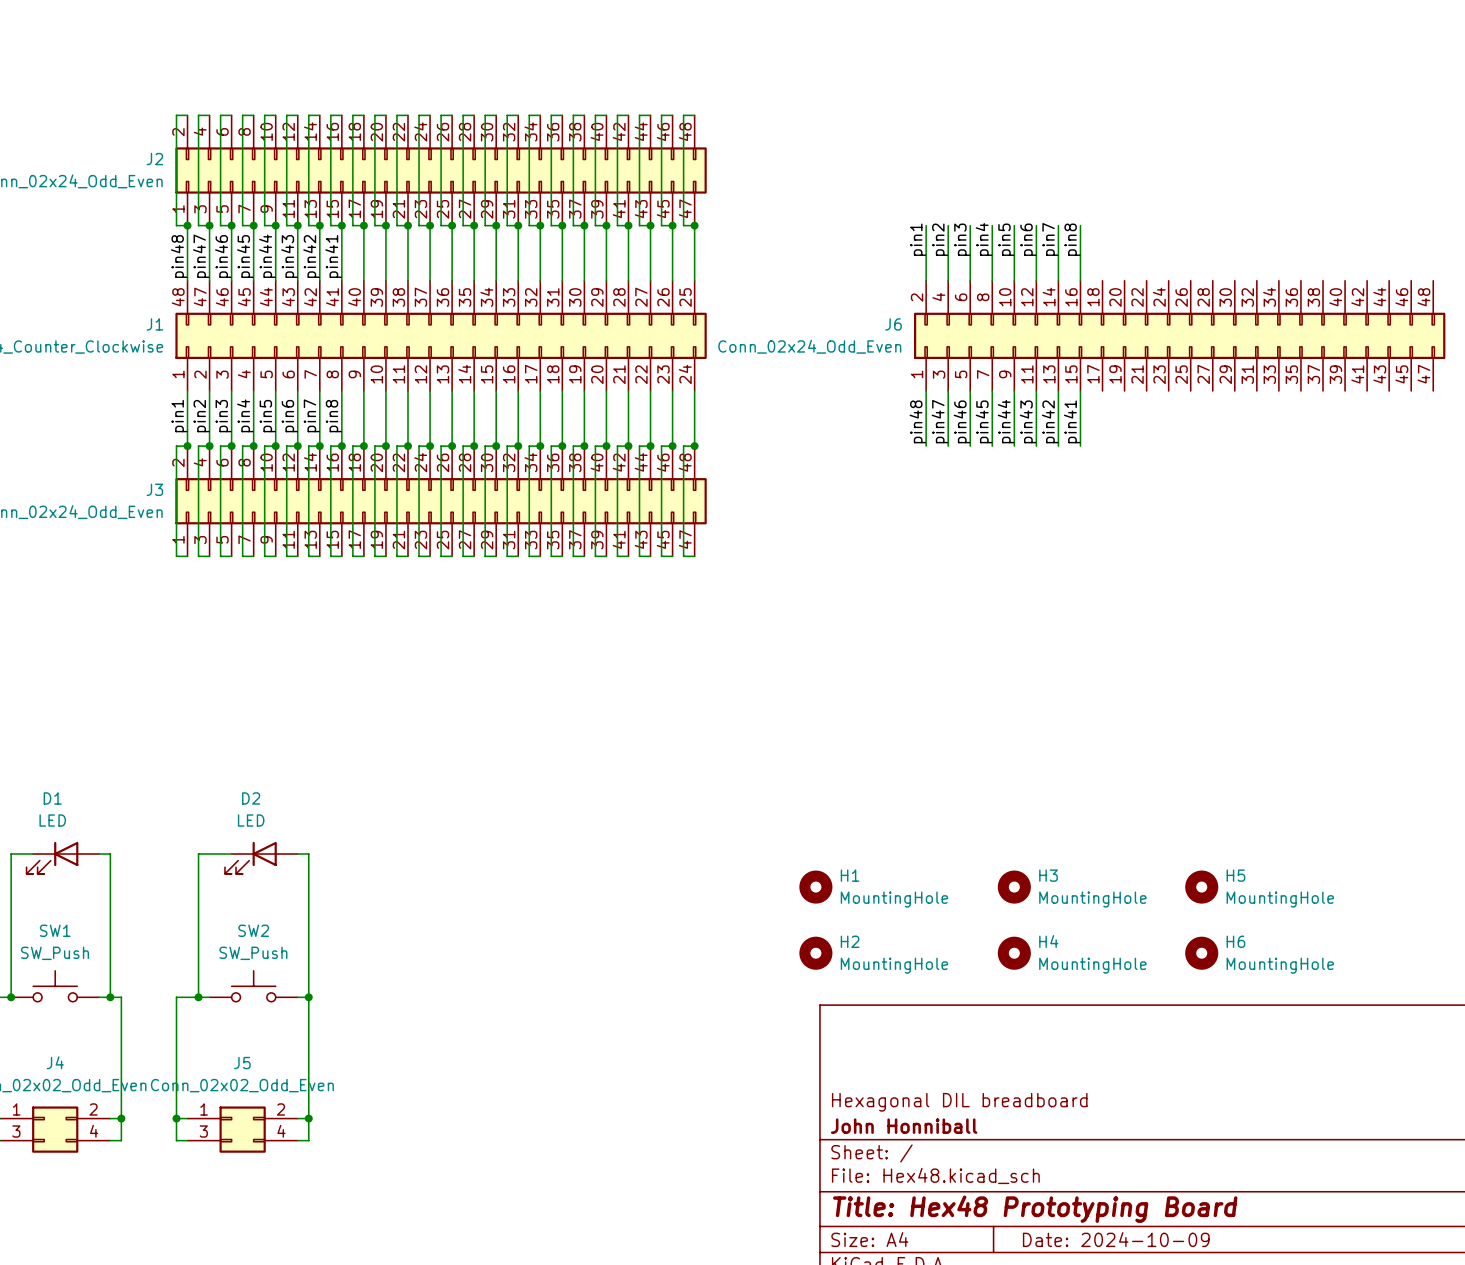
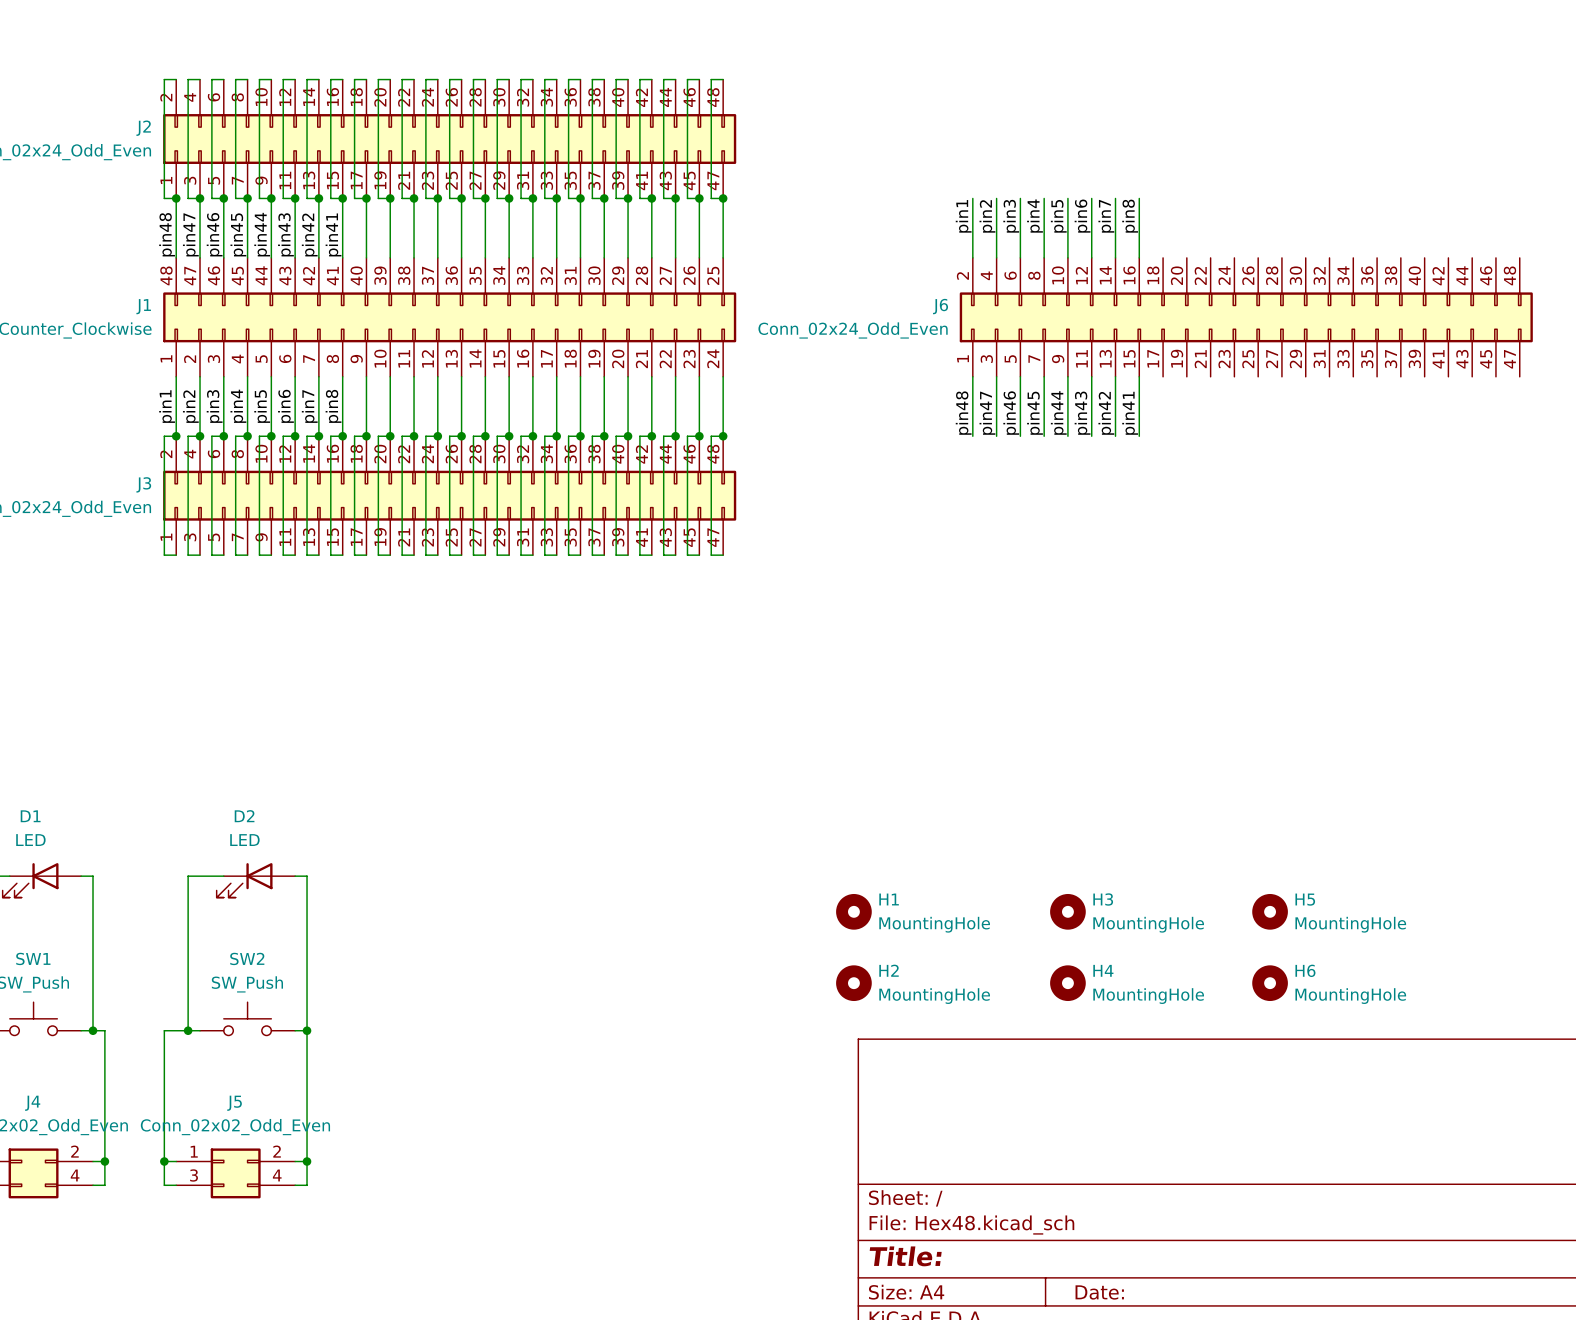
title block: Hexagonal DIL breadboard (959, 1102) -> none
title block: John Honniball (904, 1126) -> none
title block: Title: Hex48 Prototyping Board (1035, 1209) -> Title: (905, 1256)
title block: Date: 2024-10-09 (1116, 1239) -> Date: (1099, 1292)

